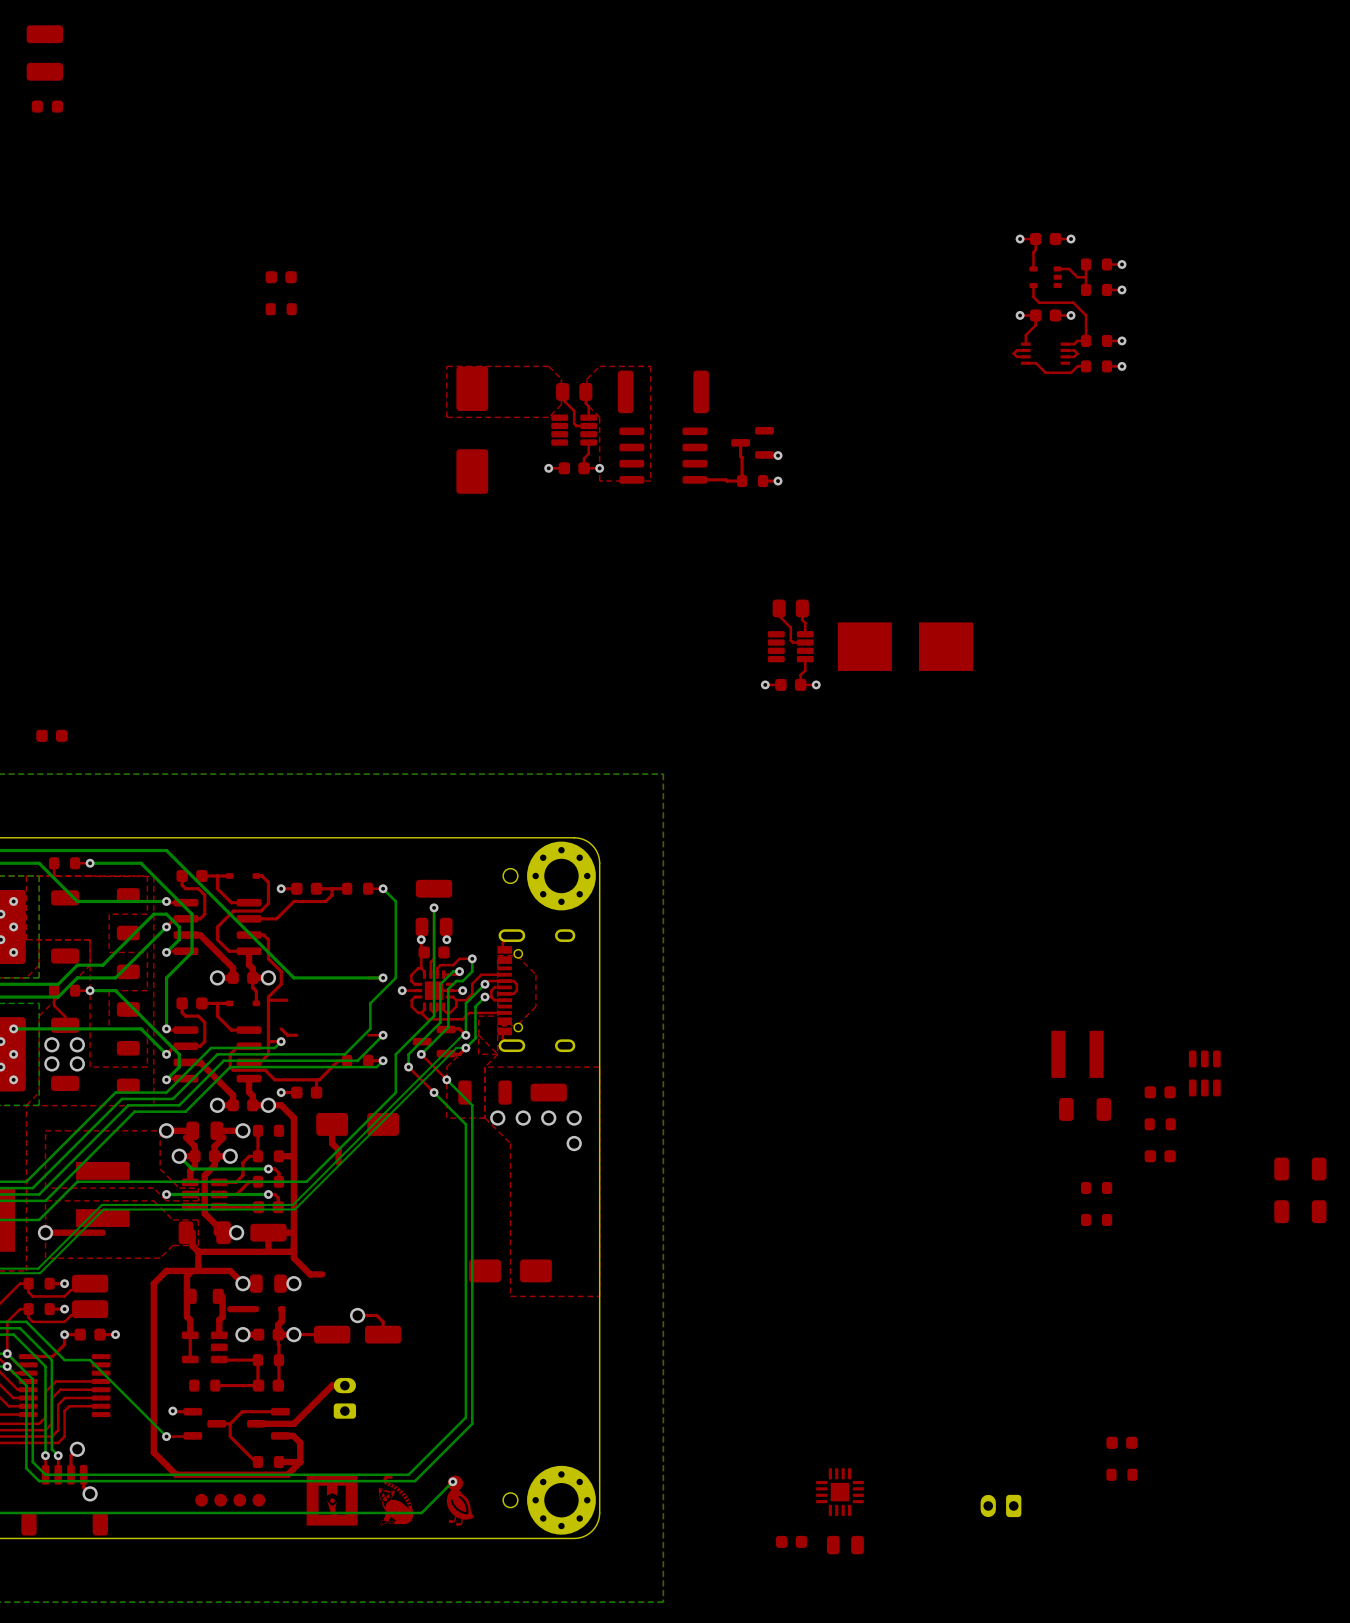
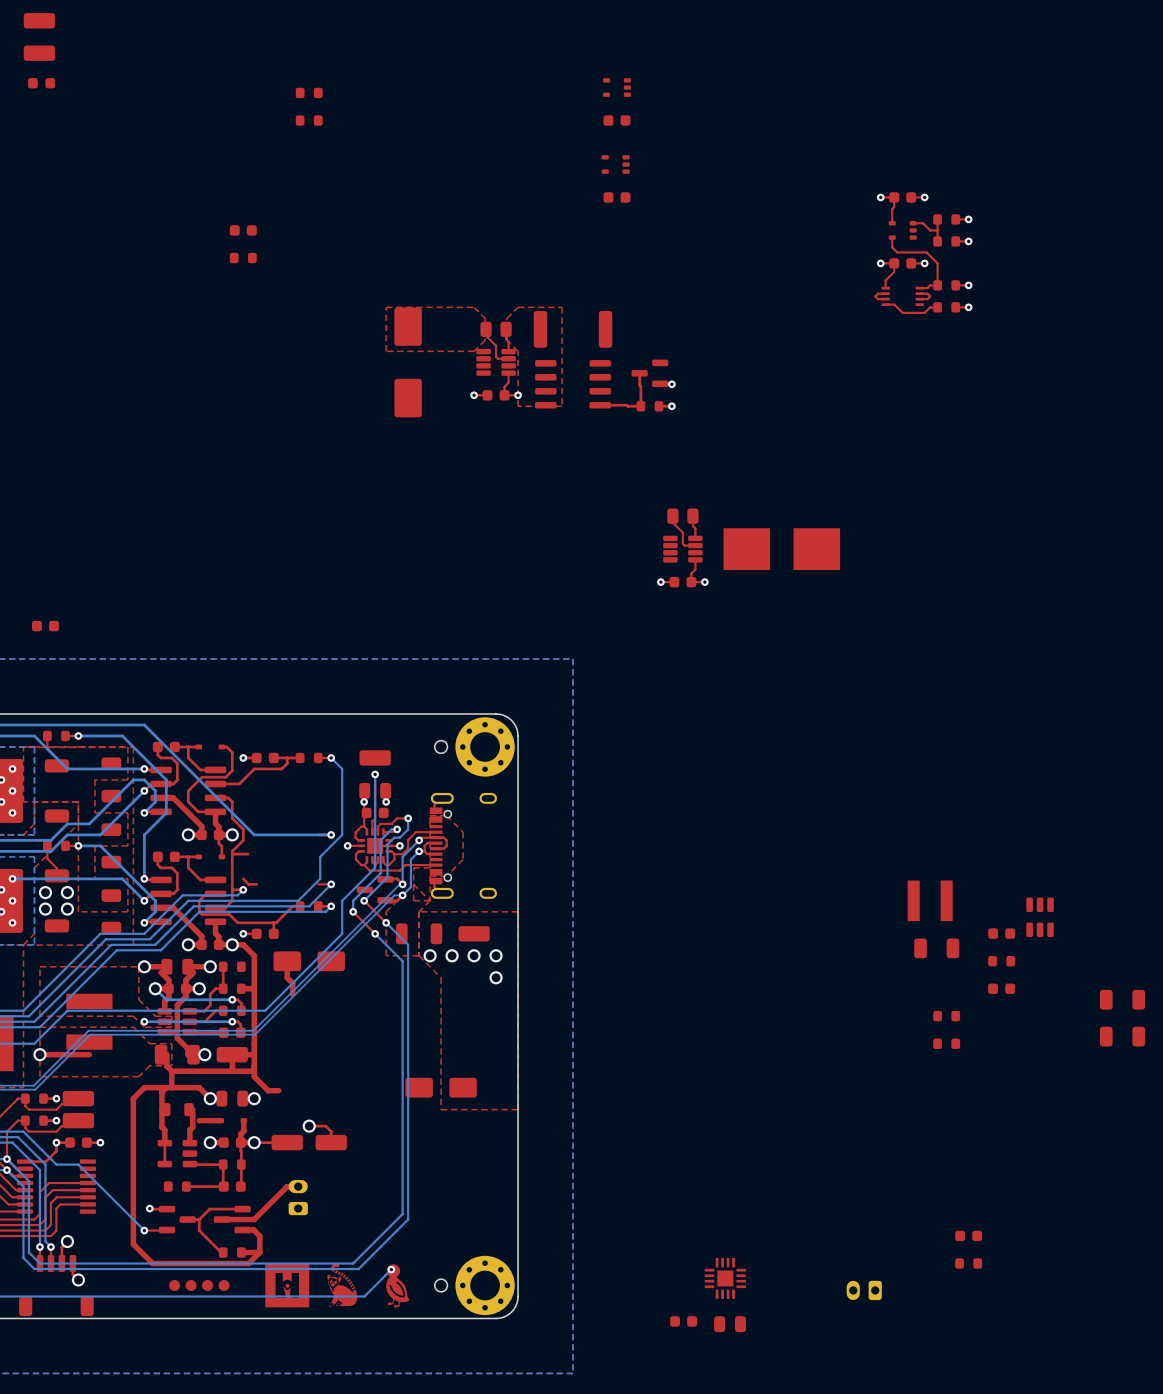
part: none -> (616, 87)
part: none -> (309, 92)
part: none -> (309, 120)
part: none -> (616, 120)
part: none -> (615, 164)
part: none -> (616, 197)

